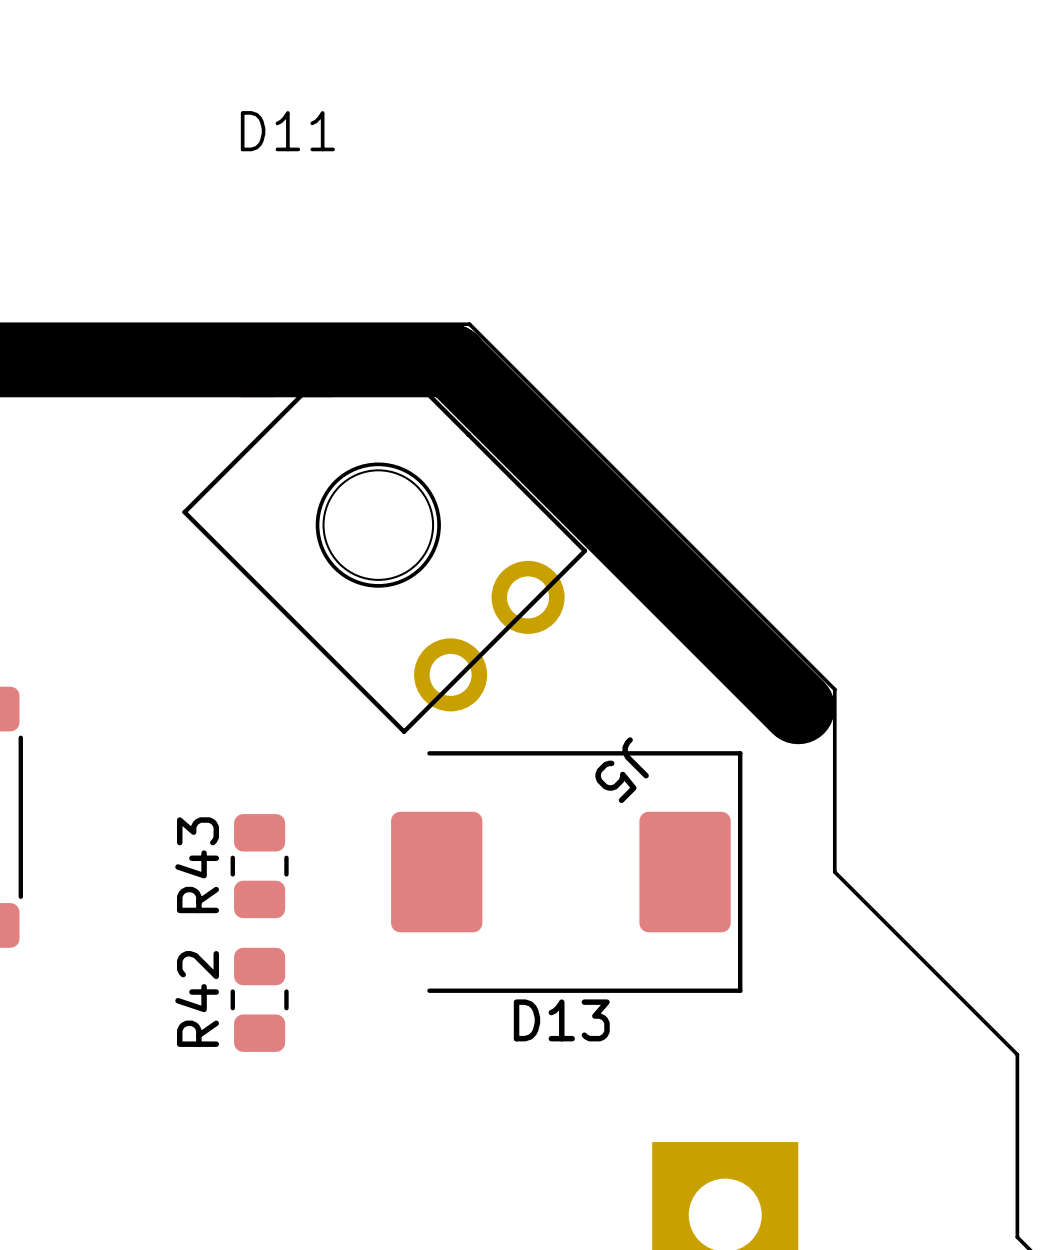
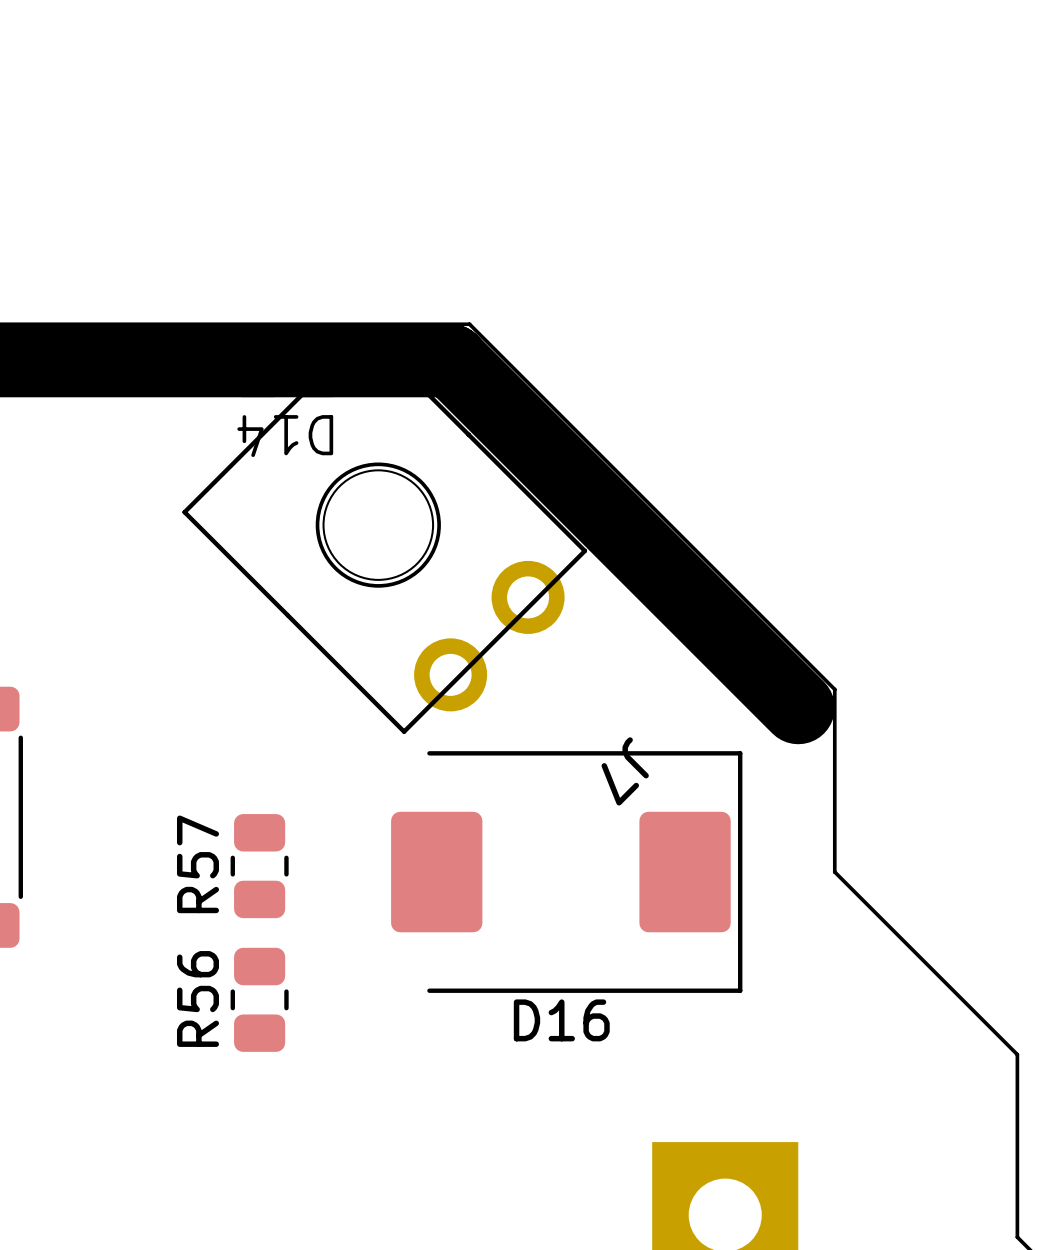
D11 name: D11 (287, 131) -> D14 (285, 436)
J5 name: J5 (622, 770) -> J7 (625, 771)
R43 name: R43 (197, 865) -> R57 (198, 864)
R42 name: R42 (197, 998) -> R56 (198, 998)
D13 name: D13 (561, 1020) -> D16 (561, 1020)

